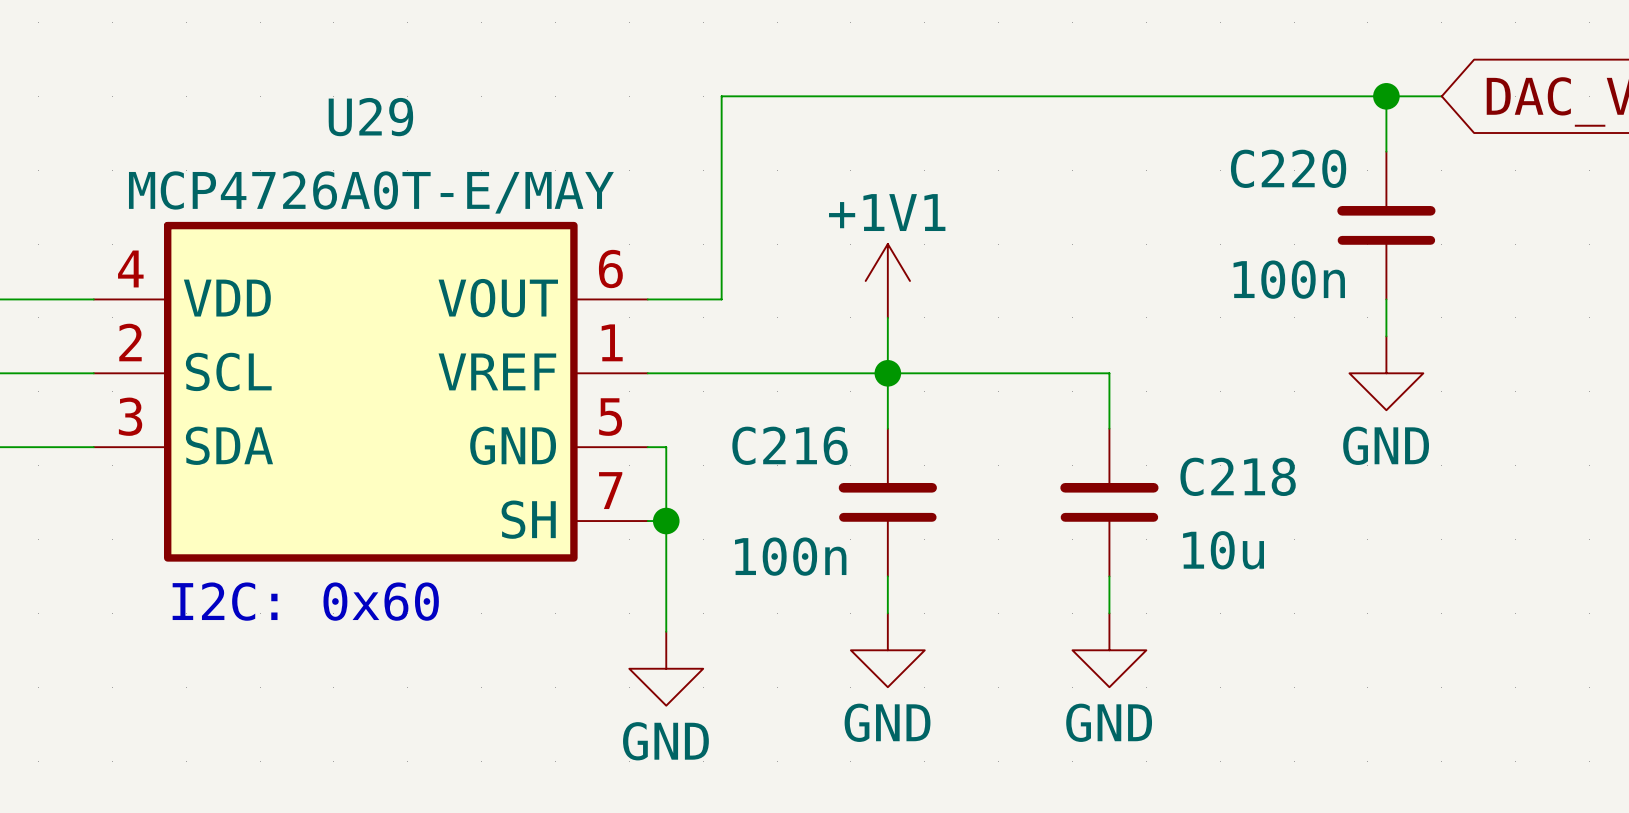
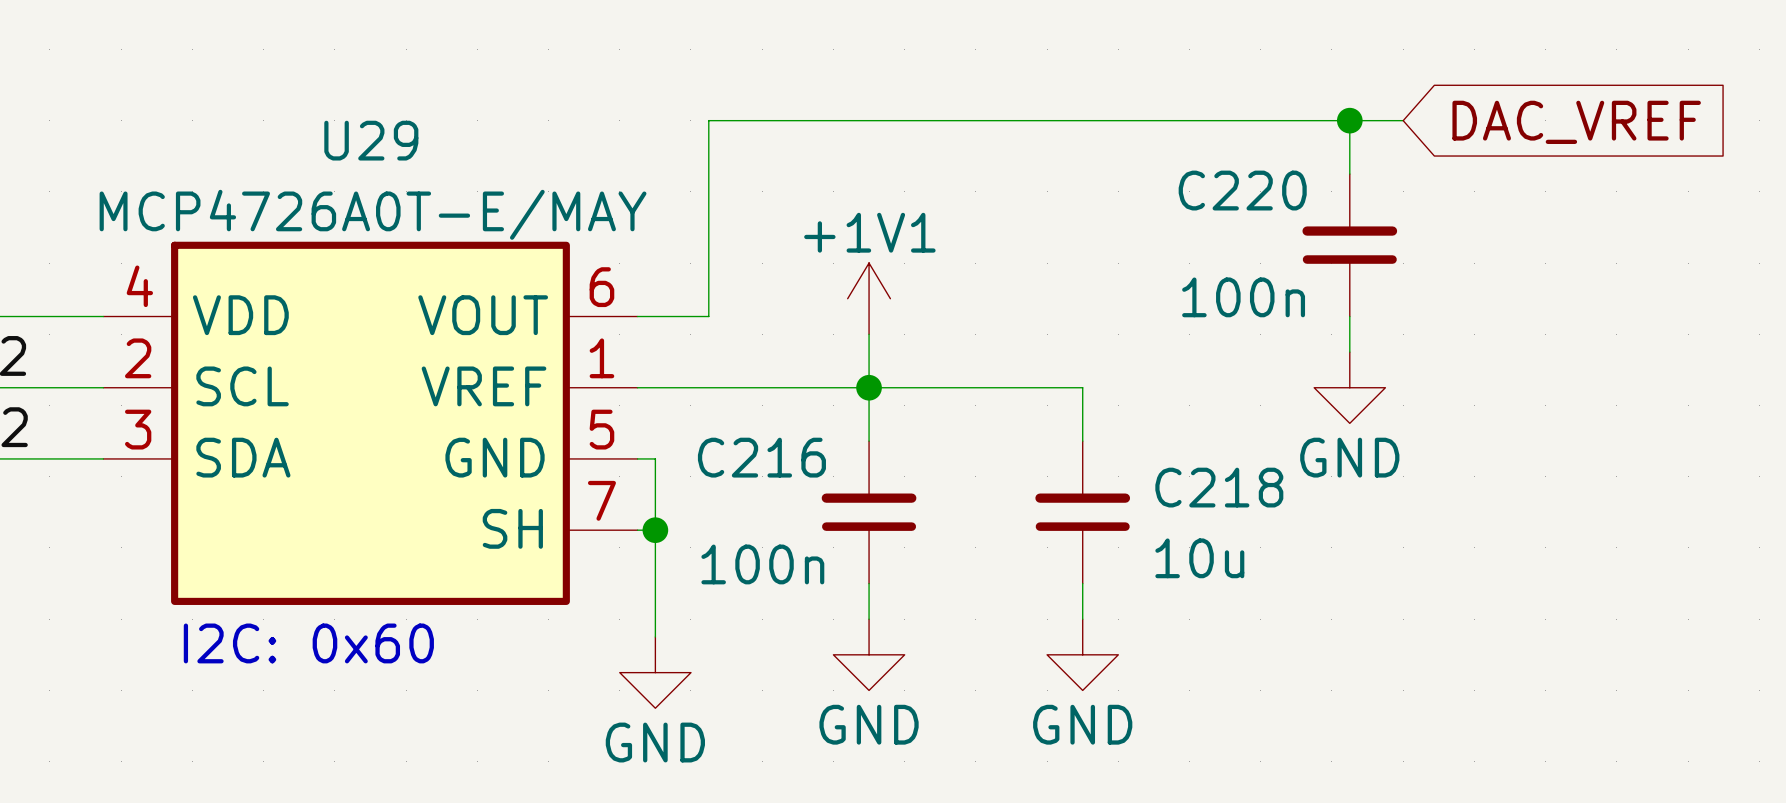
U29 symbol: [93, 221, 648, 562] -> [103, 241, 638, 605]
text position: I2C: 0x60 (305, 601) -> I2C: 0x60 (308, 643)

